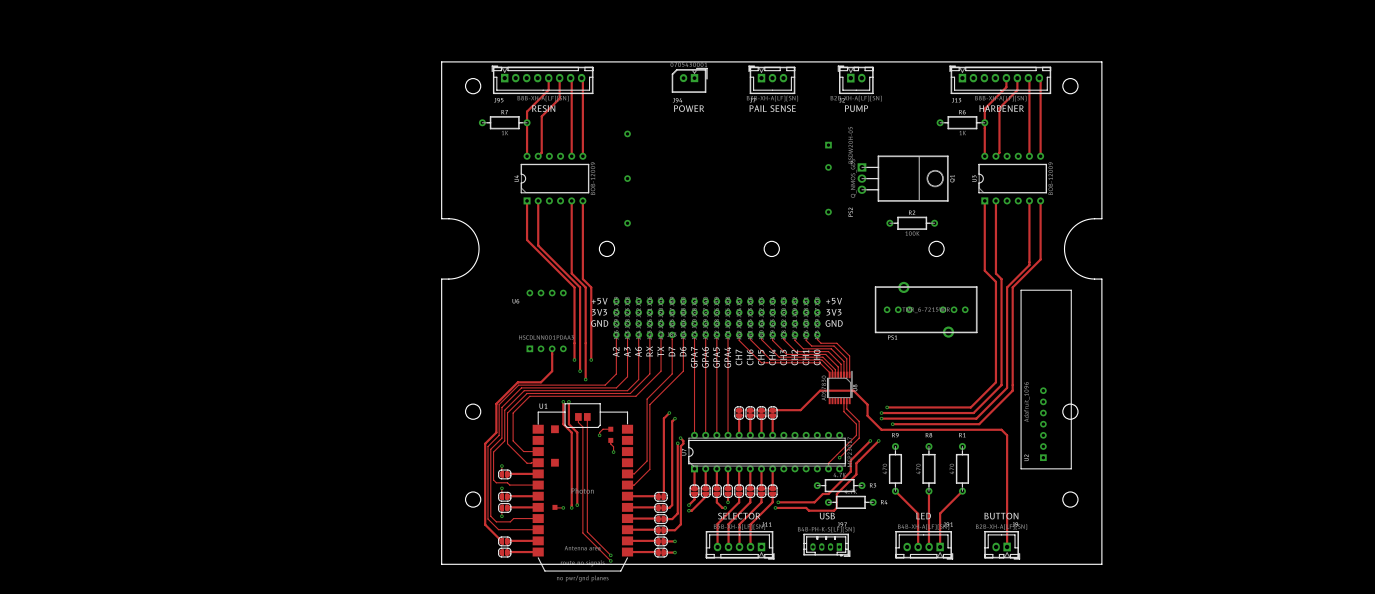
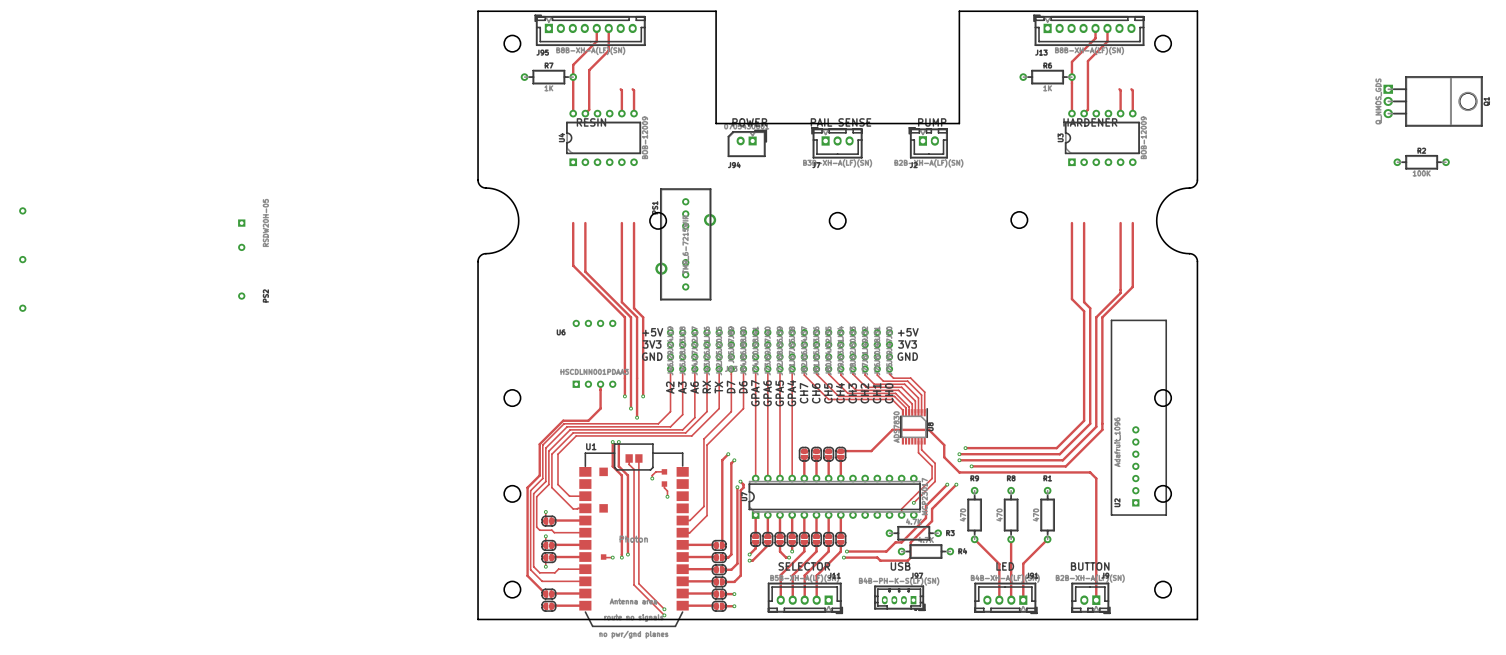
track: none -> (596, 28) (596, 41) (573, 64) (573, 113)
round board edge: none -> [503, 34, 522, 53]
round board edge: none -> [1154, 34, 1172, 53]
board edge: (441, 61) (441, 218) (457, 220) (468, 225) (475, 234) (479, 248) (475, 263) (468, 272) (457, 277) (441, 279) (441, 564) (1101, 564) (1101, 279) (1085, 277) (1075, 272) (1068, 263) (1064, 248) (1068, 234) (1075, 225) (1085, 220) (1101, 218) (1101, 61) (441, 61) -> (478, 11) (478, 181) (481, 186) (498, 190) (509, 197) (516, 208) (518, 220) (516, 233) (509, 244) (498, 251) (481, 254) (478, 260) (478, 619) (1197, 619) (1197, 260) (1193, 254) (1176, 251) (1166, 244) (1159, 233) (1156, 220) (1159, 208) (1166, 197) (1176, 190) (1193, 186) (1197, 181) (1197, 11) (959, 11) (959, 123) (716, 123) (716, 11) (478, 11)
round board edge: [465, 78, 482, 95] -> none
track: (548, 78) (548, 89) (541, 96) -> (608, 28) (608, 50) (589, 70) (589, 109)
track: (559, 78) (559, 98) (541, 116) (541, 152) (538, 156) -> none
track: (1006, 78) (1006, 87) (984, 108) (984, 156) -> (1095, 28) (1095, 38) (1071, 61) (1071, 113)
track: (1017, 78) (1017, 90) (999, 108) (999, 152) (995, 156) -> (1107, 28) (1107, 41) (1087, 61) (1087, 109) (1084, 113)
round board edge: [1062, 78, 1079, 95] -> none
part position: (542, 79) -> (590, 30)
part position: (771, 79) -> (836, 142)
part position: (855, 79) -> (928, 142)
part position: (1000, 79) -> (1088, 30)
part position: (689, 80) -> (747, 143)
track: (538, 100) (527, 111) (527, 156) -> none
track: (571, 100) (571, 156) -> none
track: (582, 100) (582, 156) -> none
track: (1029, 100) (1029, 156) -> none
track: (1040, 100) (1040, 156) -> none
part position: (504, 122) -> (548, 77)
part position: (962, 122) -> (1047, 77)
part position: (554, 178) -> (603, 137)
part position: (728, 178) -> (132, 259)
part position: (902, 178) -> (1432, 101)
part position: (1012, 178) -> (1102, 137)
round board edge: none -> [649, 212, 667, 230]
round board edge: none -> [829, 212, 847, 230]
round board edge: none -> [1010, 211, 1029, 229]
part position: (912, 223) -> (1421, 162)
round board edge: [598, 240, 616, 257] -> none
round board edge: [763, 240, 780, 257] -> none
round board edge: [928, 240, 945, 257] -> none
part rotation: 0° (926, 309) -> 90° clockwise (685, 244)
part position: (926, 309) -> (685, 244)
round board edge: none -> [503, 389, 522, 407]
round board edge: none -> [1154, 389, 1172, 407]
round board edge: [465, 403, 482, 420] -> none
round board edge: [1062, 403, 1079, 420] -> none
round board edge: none -> [503, 485, 522, 503]
round board edge: none -> [1154, 485, 1172, 503]
round board edge: [465, 491, 482, 508] -> none
round board edge: [1062, 491, 1079, 508] -> none
round board edge: none -> [503, 580, 522, 599]
round board edge: none -> [1154, 580, 1172, 599]

